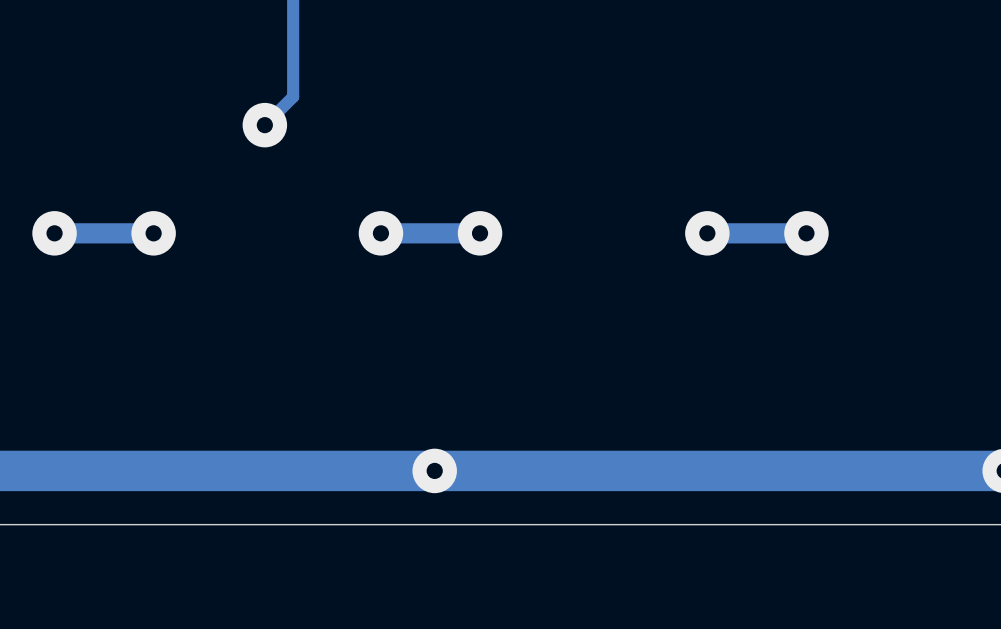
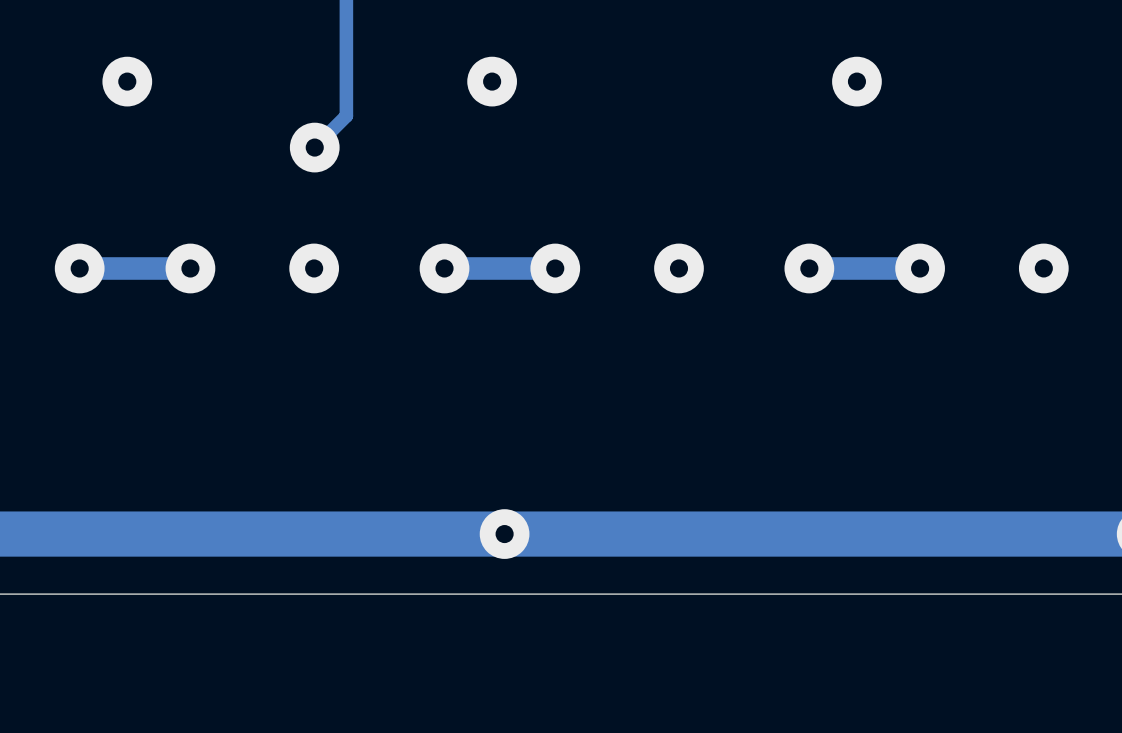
via: none -> (127, 81)
via: none -> (492, 81)
via: none -> (856, 81)
via: none -> (314, 268)
via: none -> (678, 268)
via: none -> (1043, 268)

